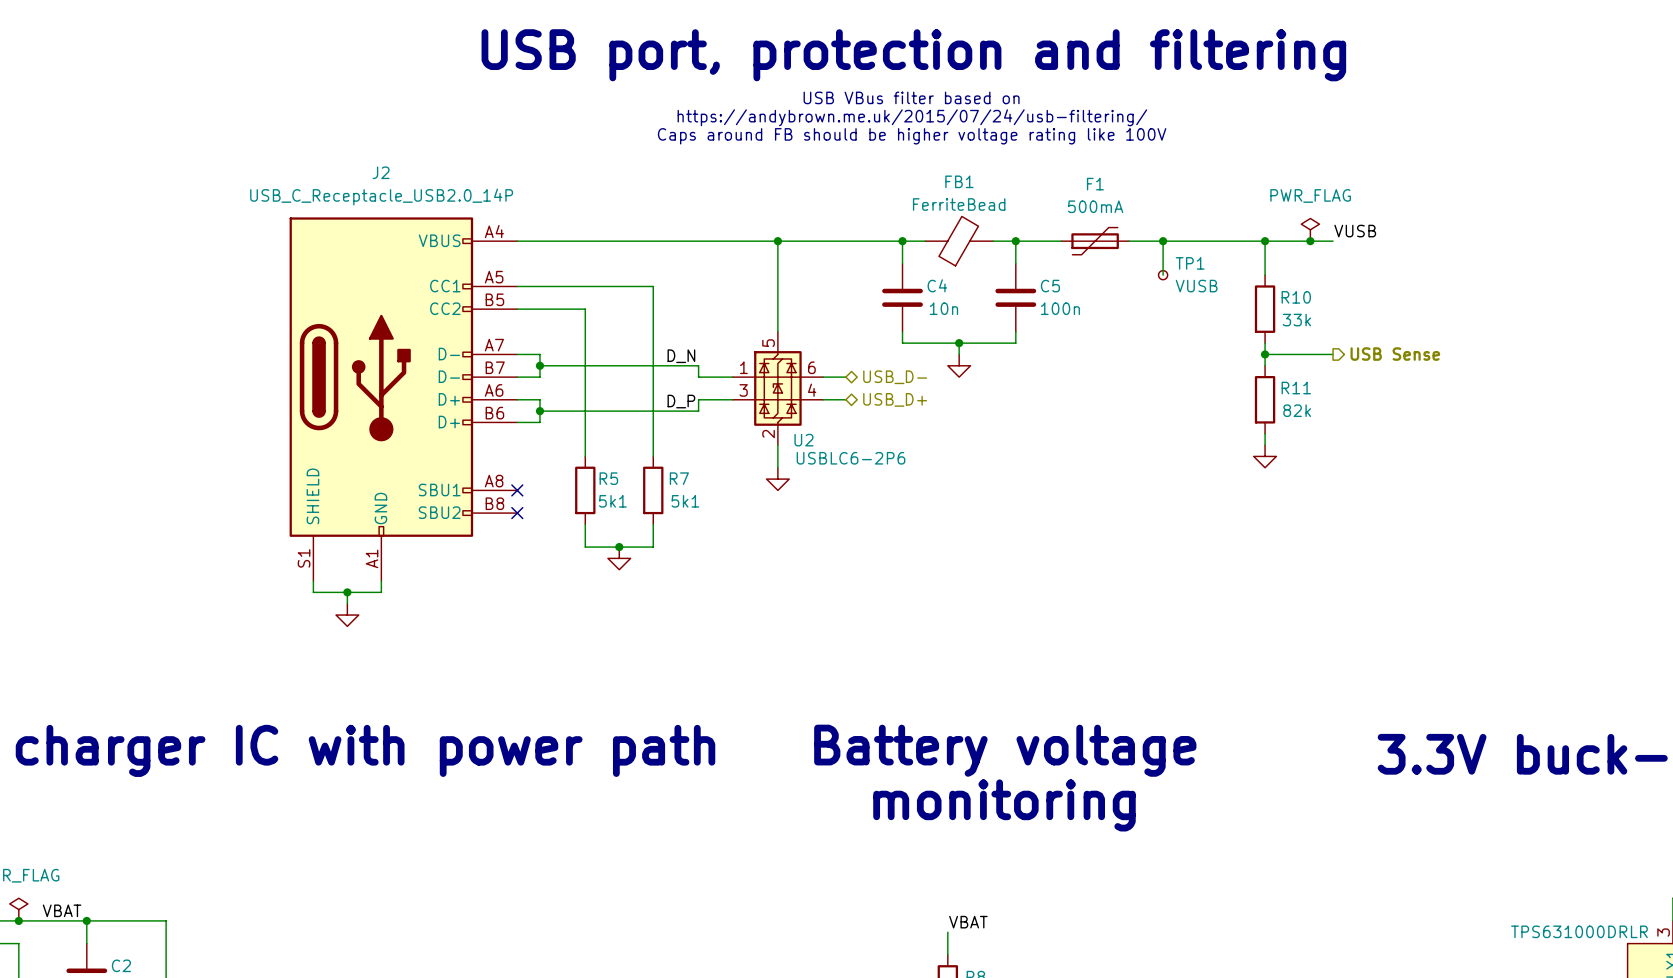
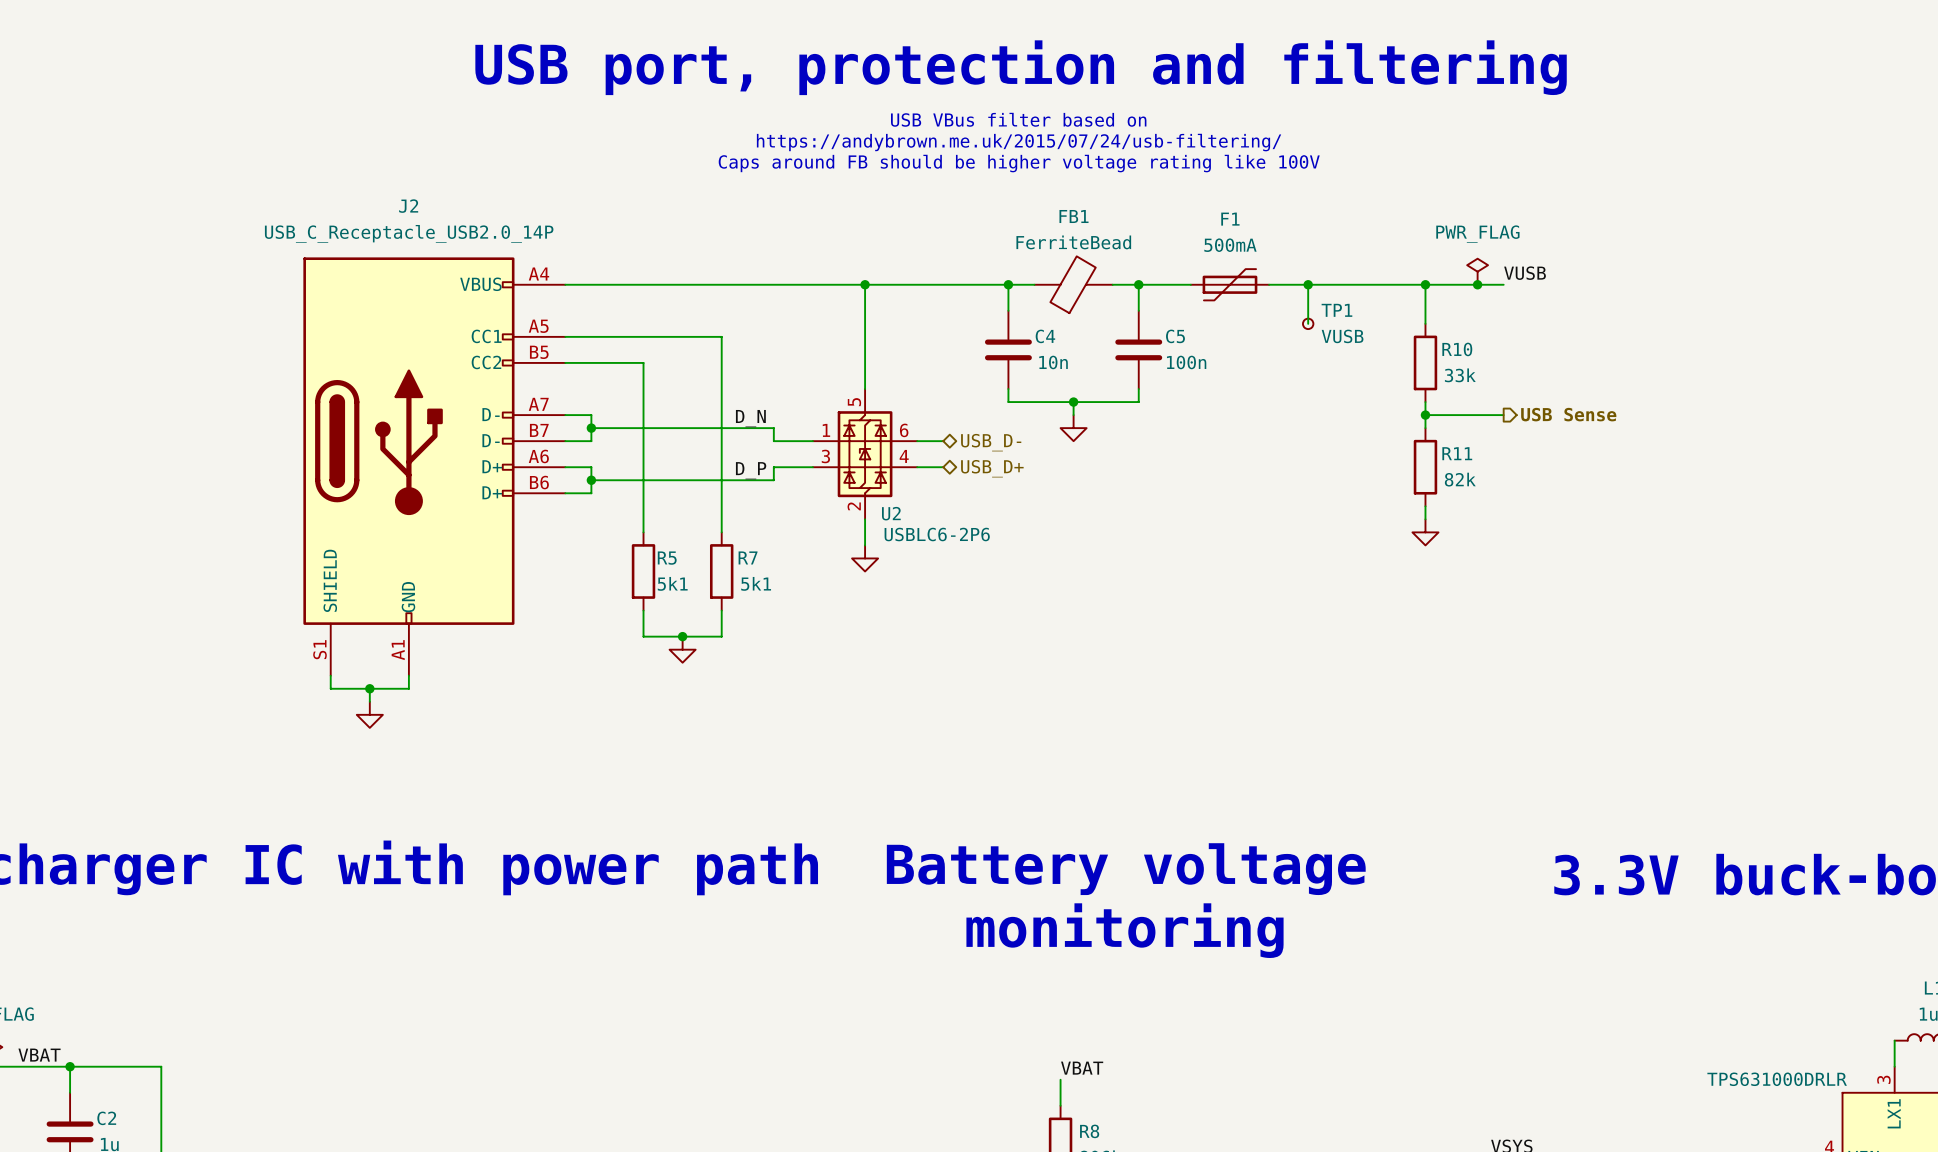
J2 symbol: [289, 217, 518, 582] -> [303, 257, 566, 676]
no-connect mark: (517, 490) -> none
no-connect mark: (517, 513) -> none

